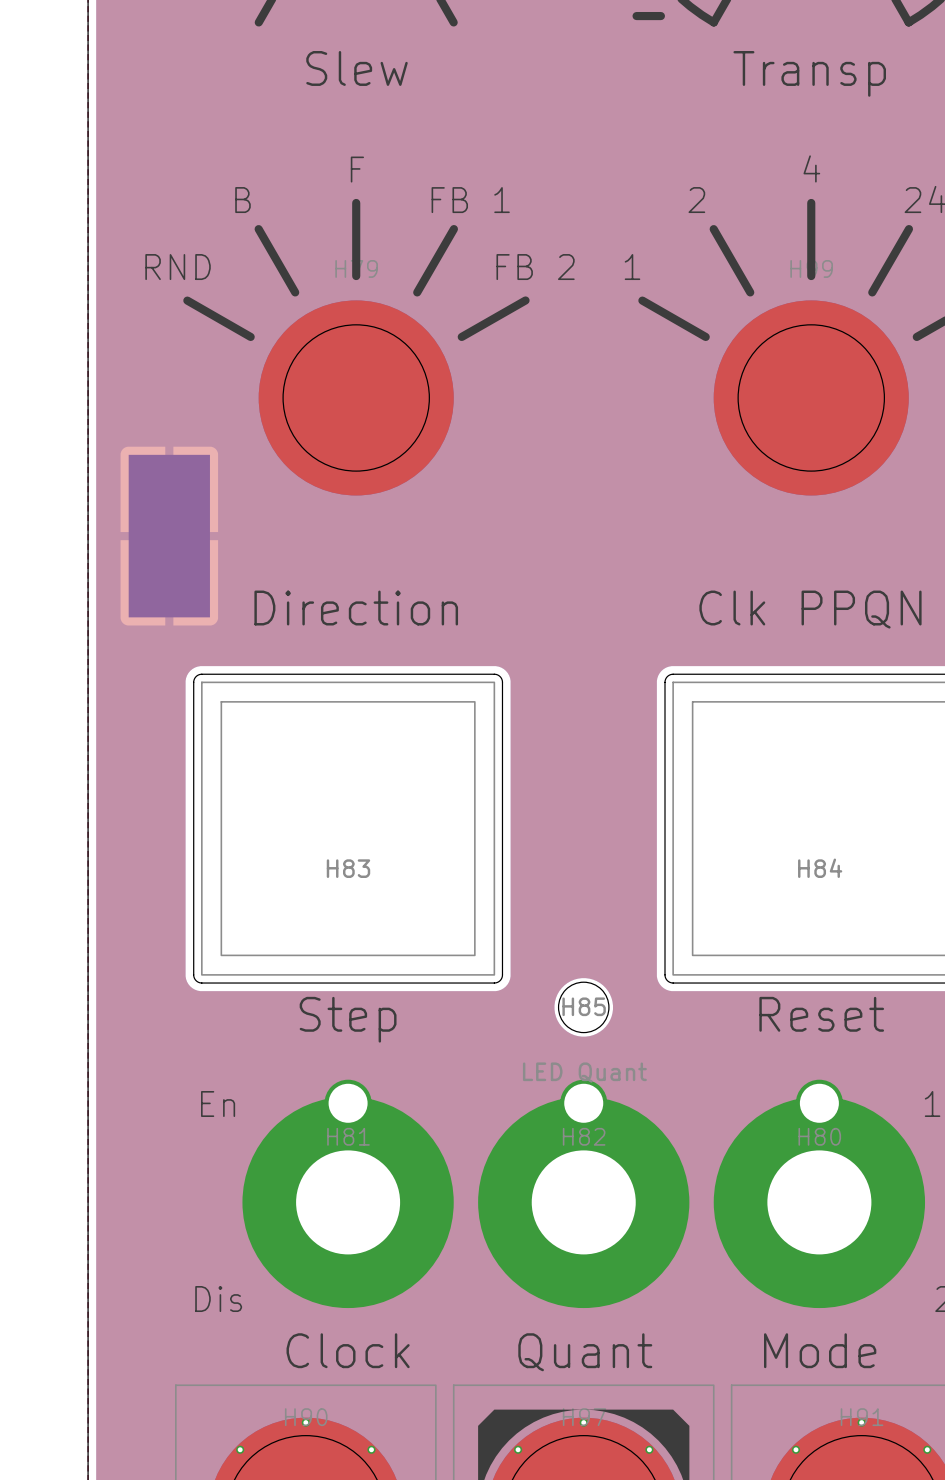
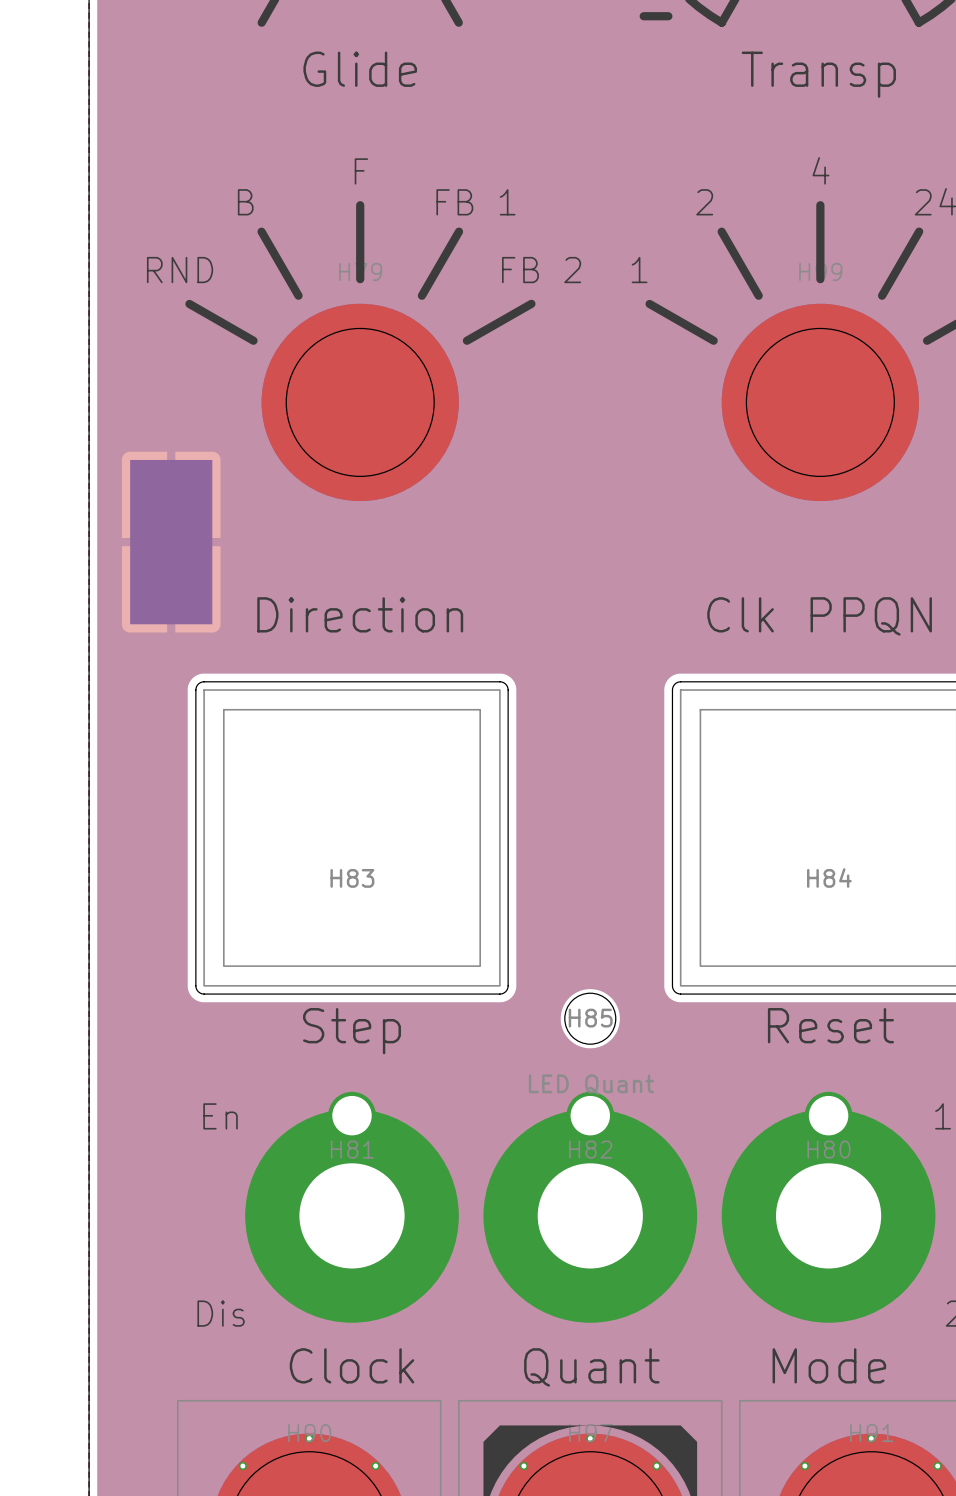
part value: Slew (356, 68) -> Glide (360, 69)

